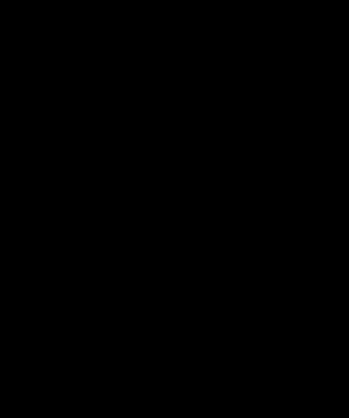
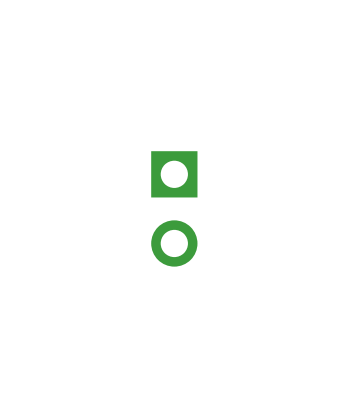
part: none -> (174, 208)

